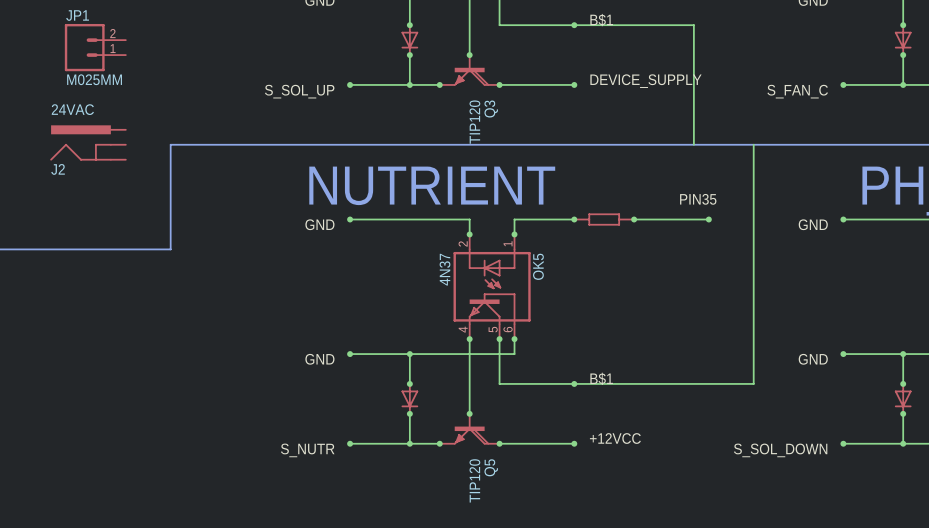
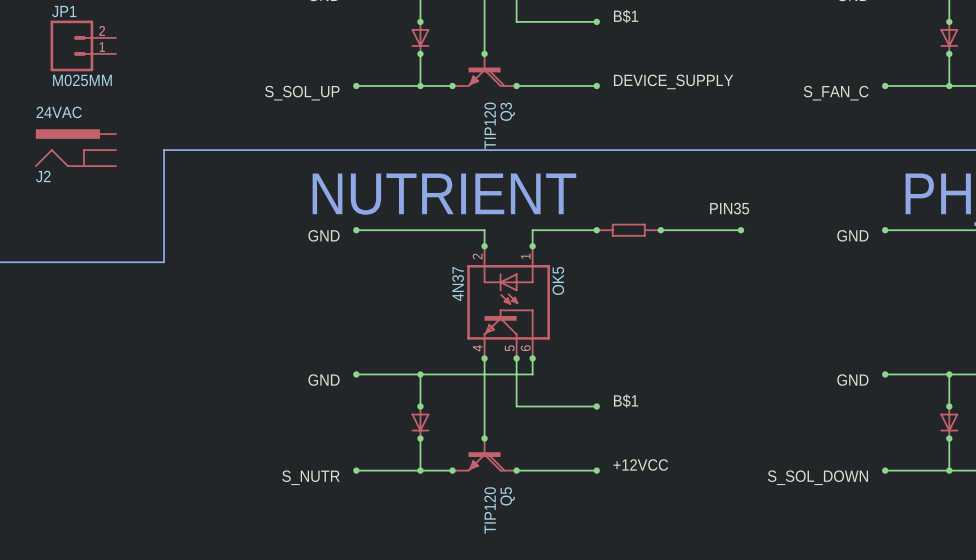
wire: (574, 25) (693, 25) (693, 144) -> none
wire: (753, 144) (753, 383) (574, 383) -> none

